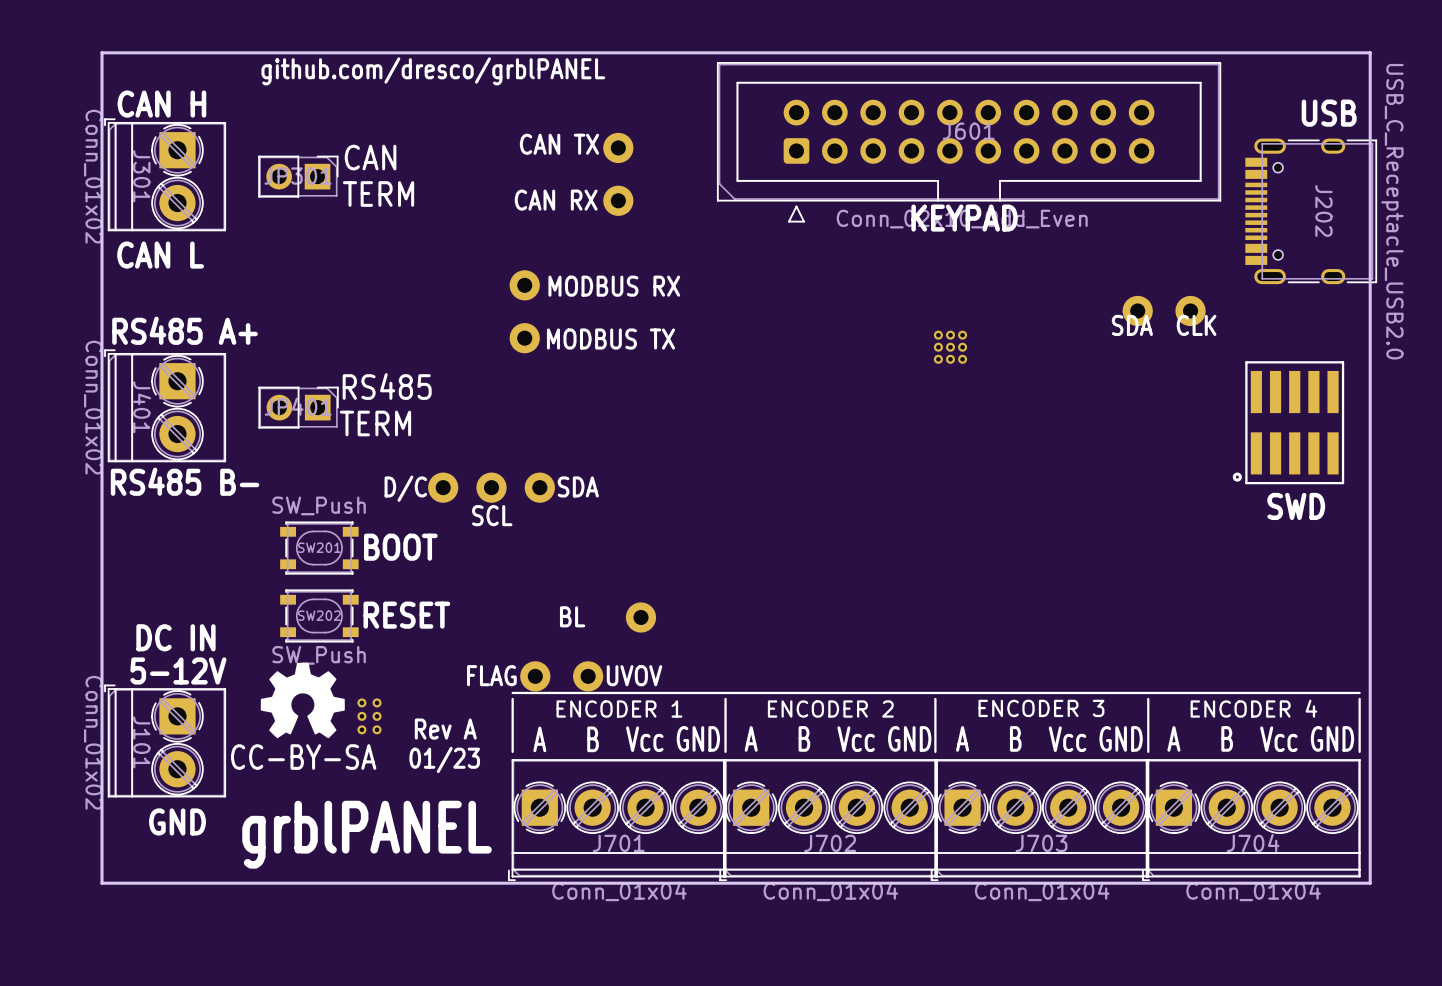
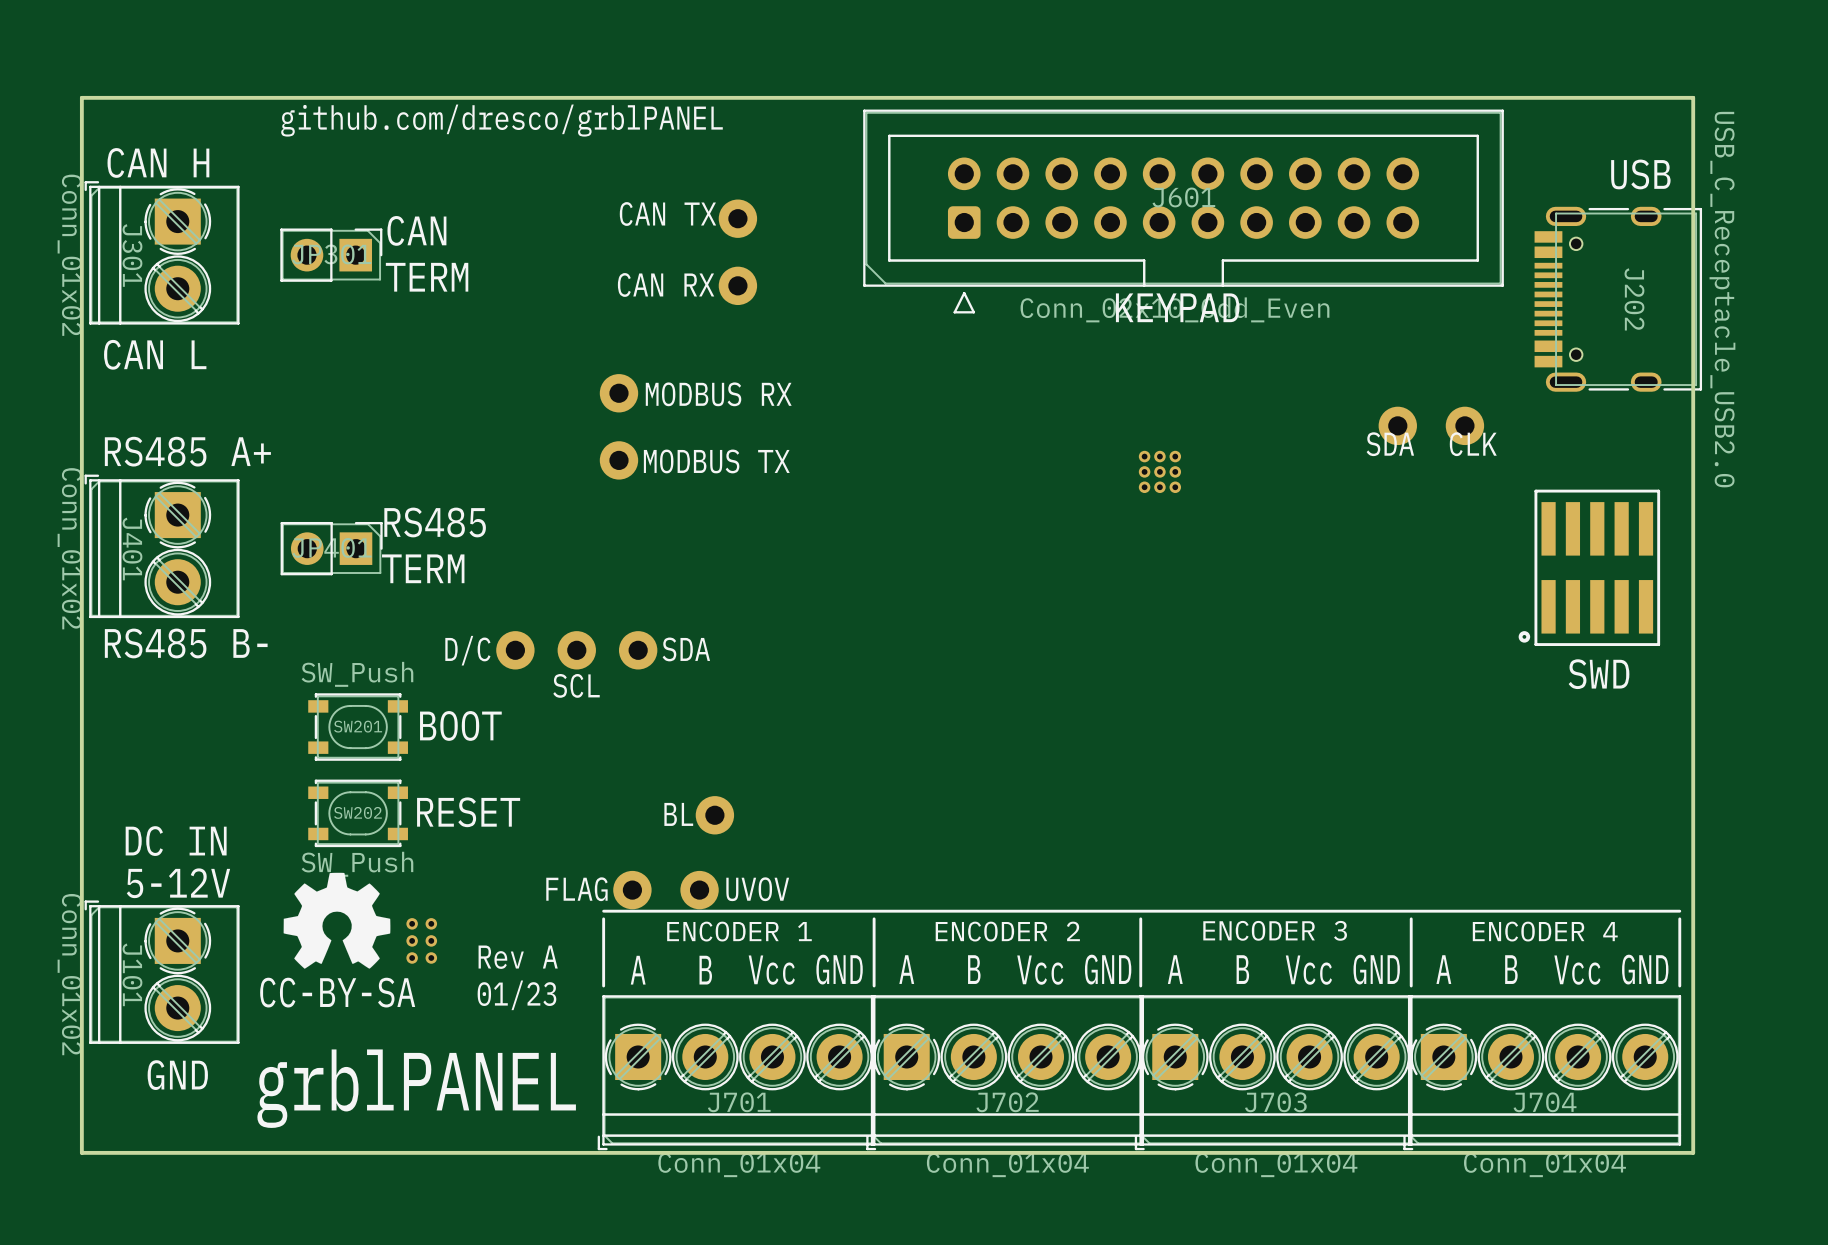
part position: (640, 617) -> (714, 815)

